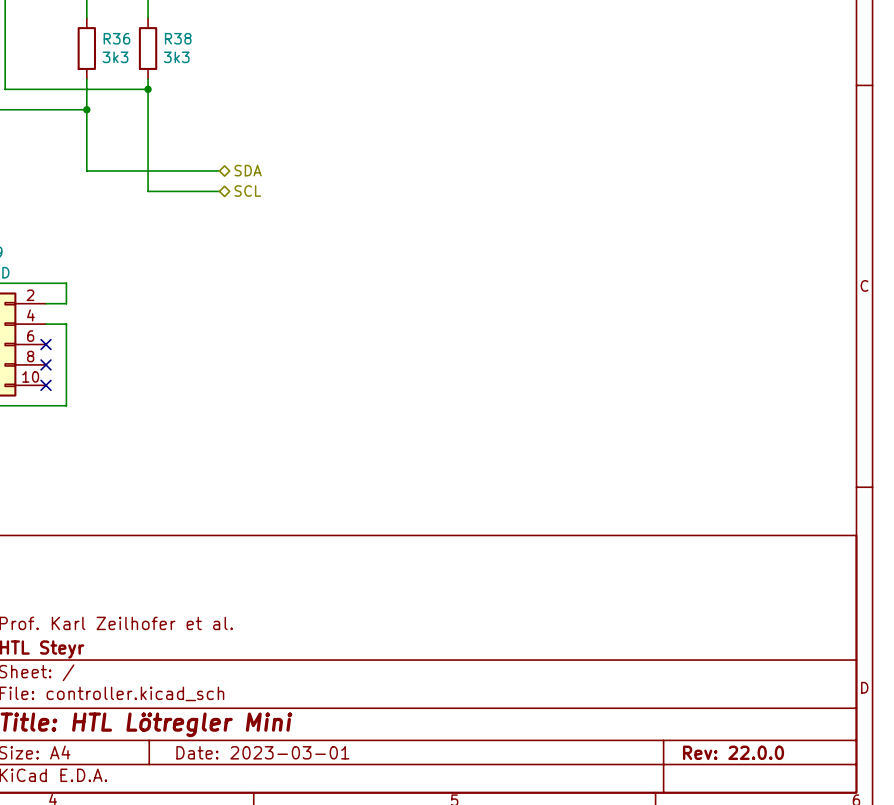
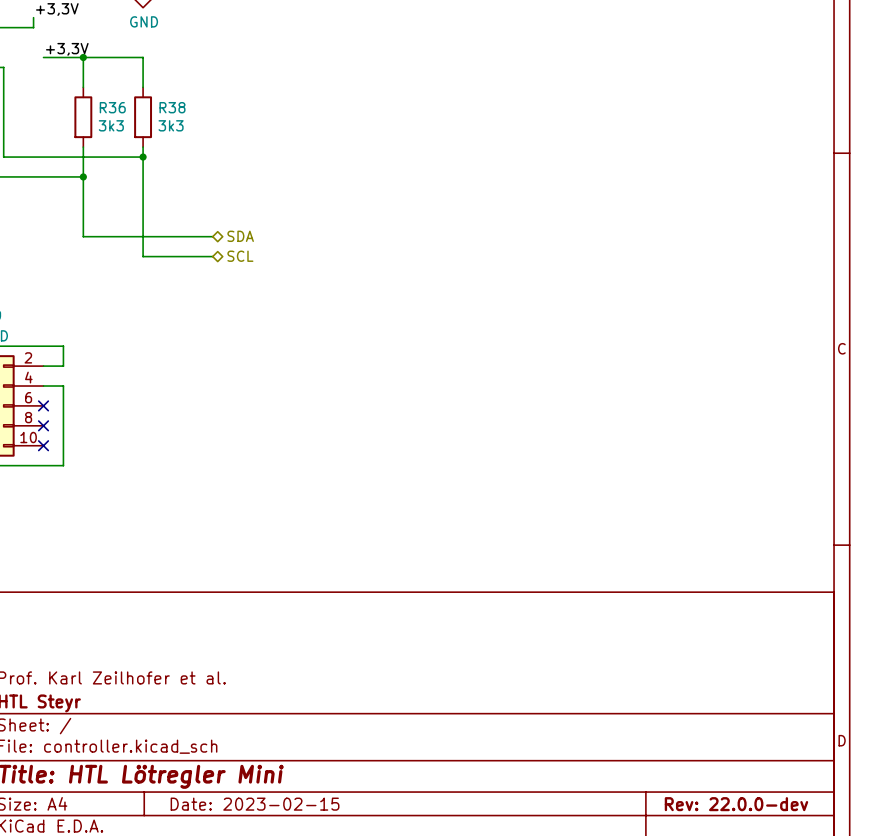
title block: Date: 2023-03-01 (262, 752) -> Date: 2023-02-15 (255, 804)
title block: Rev: 22.0.0 (733, 752) -> Rev: 22.0.0-dev (736, 804)

